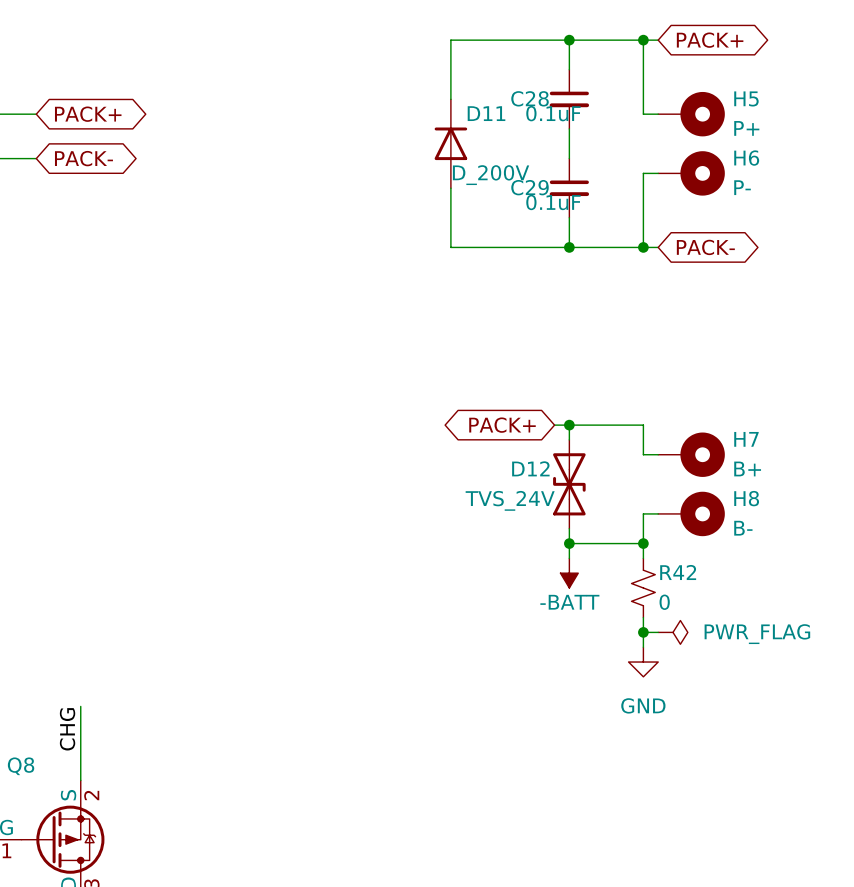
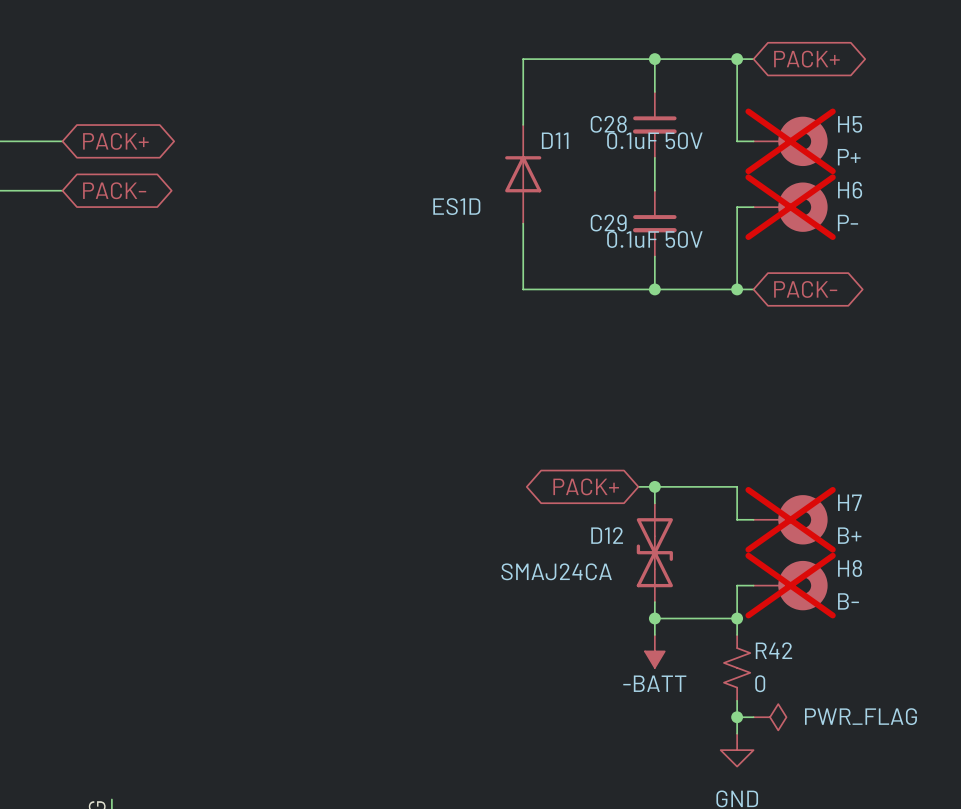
C28 value: 0.1uF (553, 113) -> 0.1uF 50V (654, 140)
H5 do-not-place cross: none -> (790, 141)
H6 do-not-place cross: none -> (790, 207)
D11 value: D_200V (491, 175) -> ES1D (456, 206)
C29 value: 0.1uF (553, 202) -> 0.1uF 50V (654, 239)
H7 do-not-place cross: none -> (790, 519)
D12 value: TVS_24V (510, 500) -> SMAJ24CA (556, 571)
H8 do-not-place cross: none -> (790, 585)

